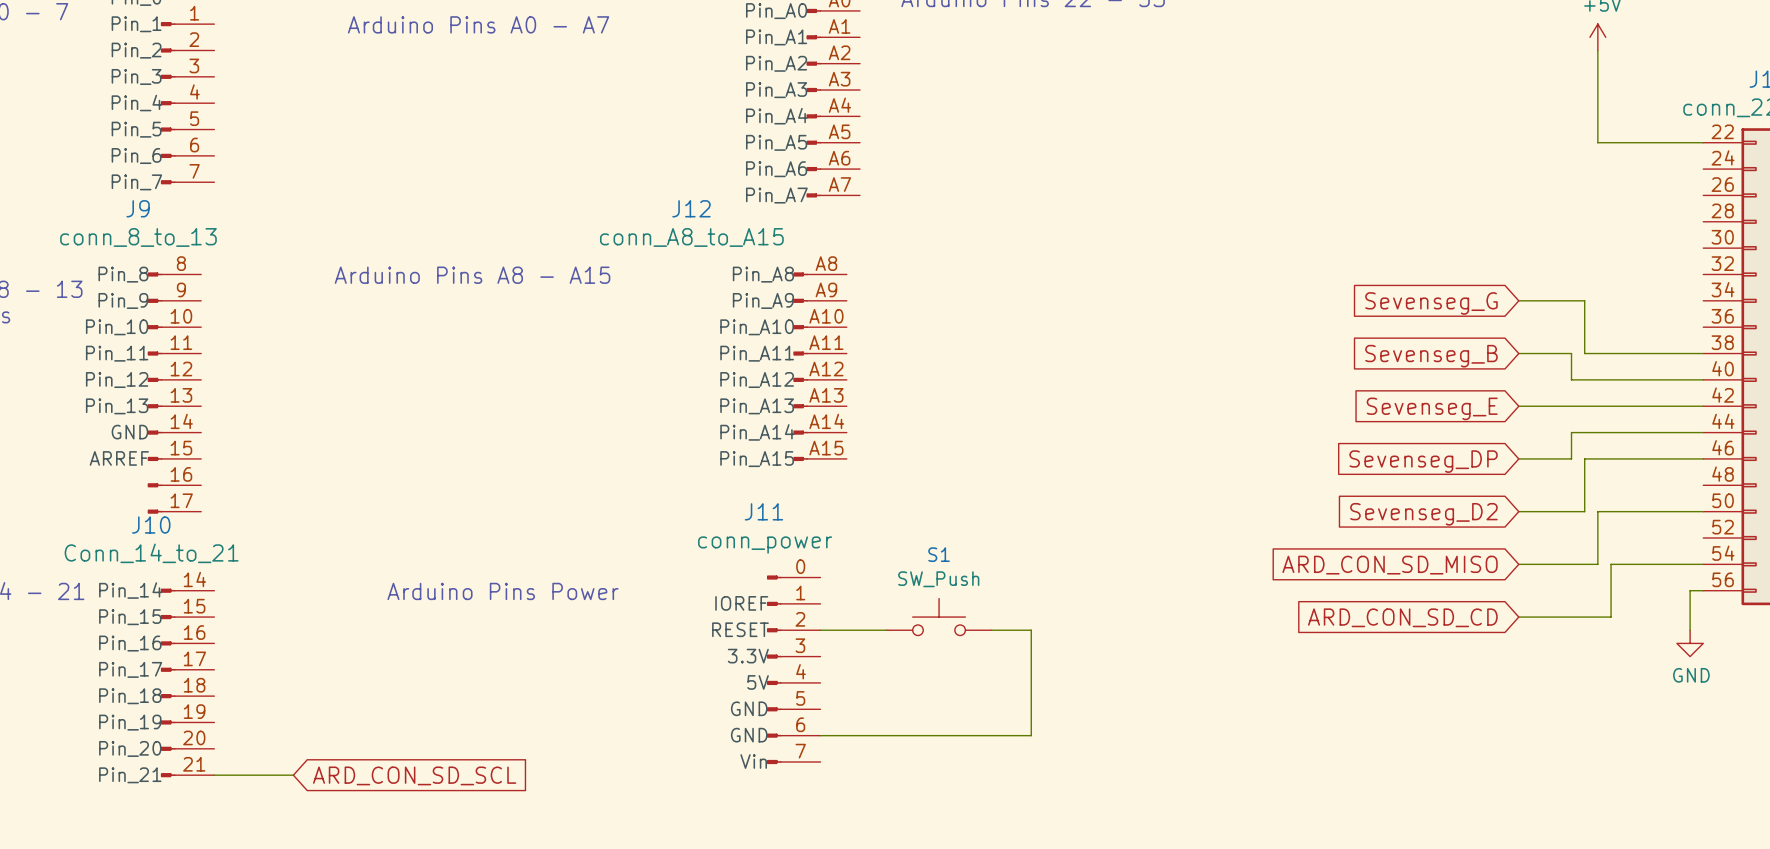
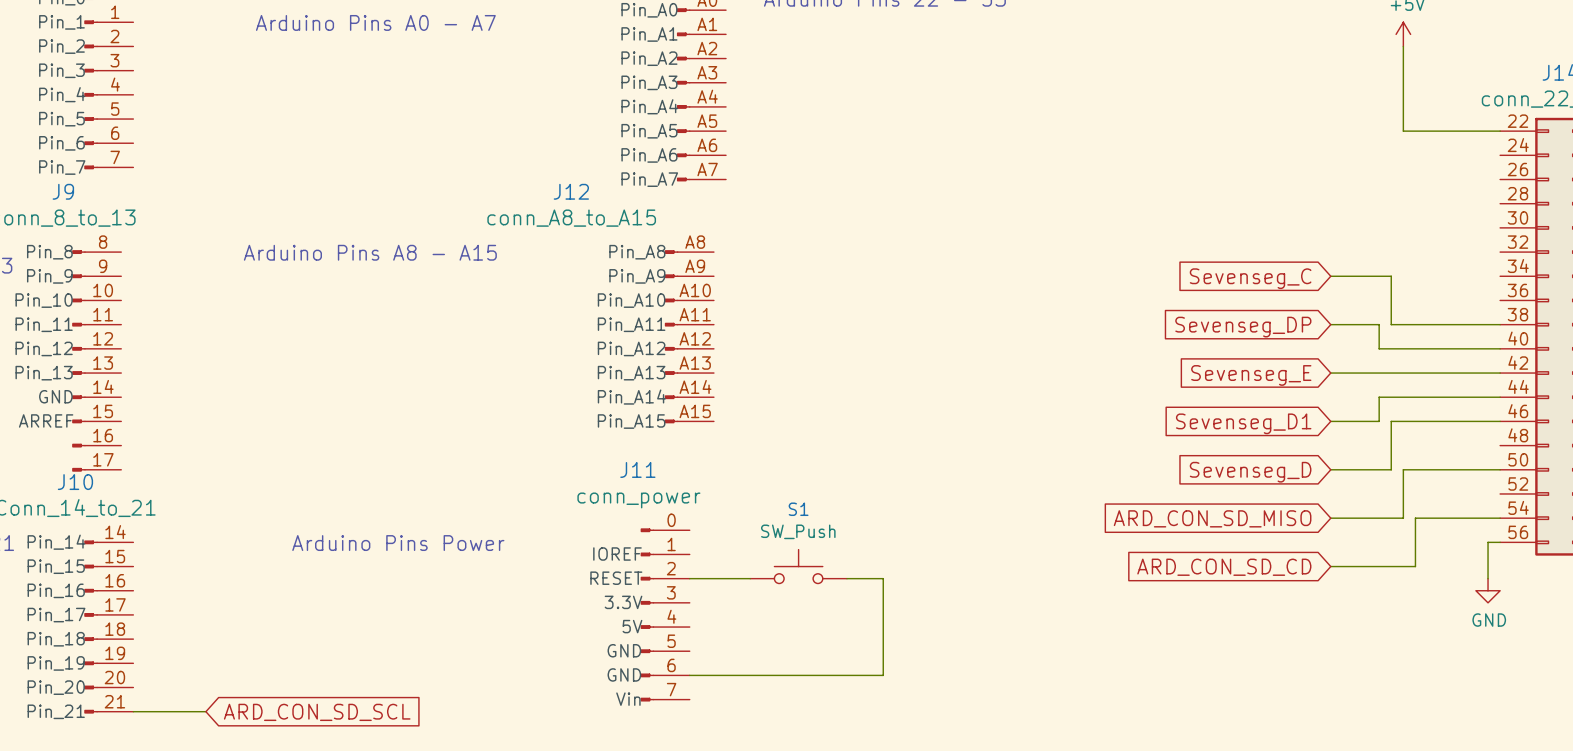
global label: Sevenseg_G (1431, 303) -> Sevenseg_C (1250, 278)
global label: Sevenseg_B (1431, 356) -> Sevenseg_DP (1243, 327)
global label: Sevenseg_DP (1423, 461) -> Sevenseg_D1 (1243, 423)
global label: Sevenseg_D2 (1423, 514) -> Sevenseg_D (1250, 472)

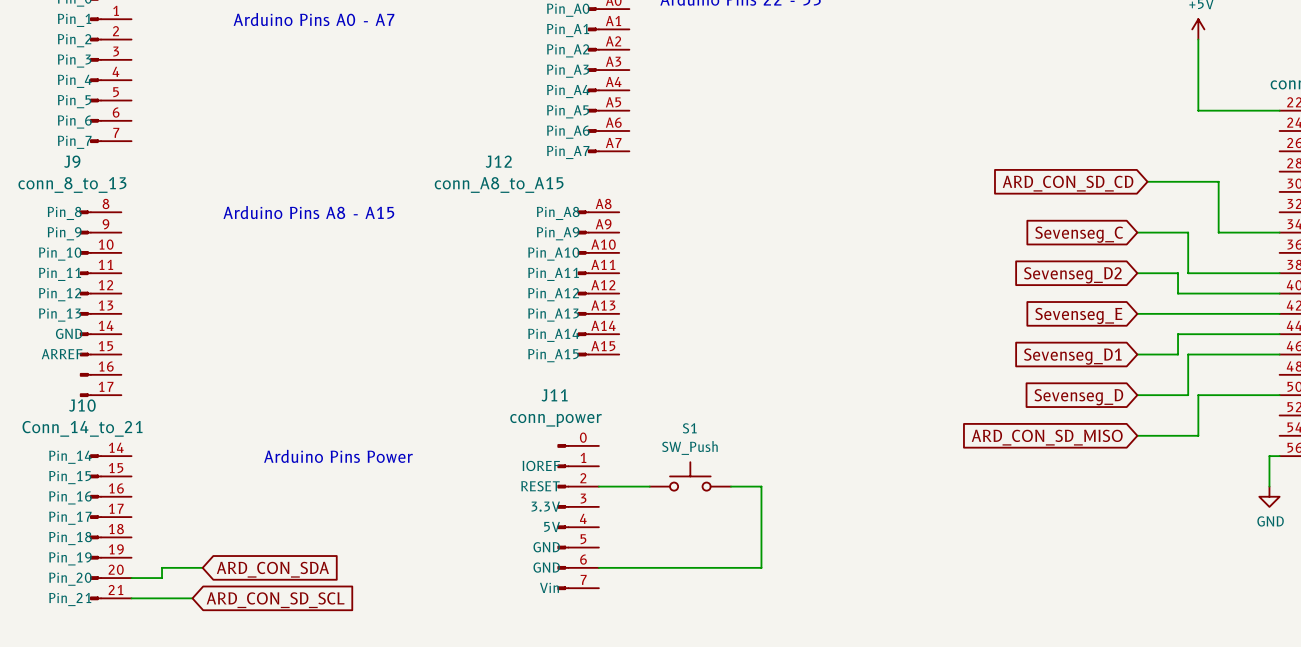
wire: none -> (1147, 181) (1218, 181) (1218, 232) (1279, 232)
global label: none -> ARD_CON_SD_CD (1068, 183)
global label: Sevenseg_DP (1243, 327) -> Sevenseg_D2 (1072, 275)
wire: (1500, 518) (1415, 518) (1415, 566) (1330, 566) -> none
global label: ARD_CON_SD_CD (1224, 567) -> none
wire: none -> (202, 567) (162, 567) (162, 578) (131, 578)
global label: none -> ARD_CON_SDA (272, 569)

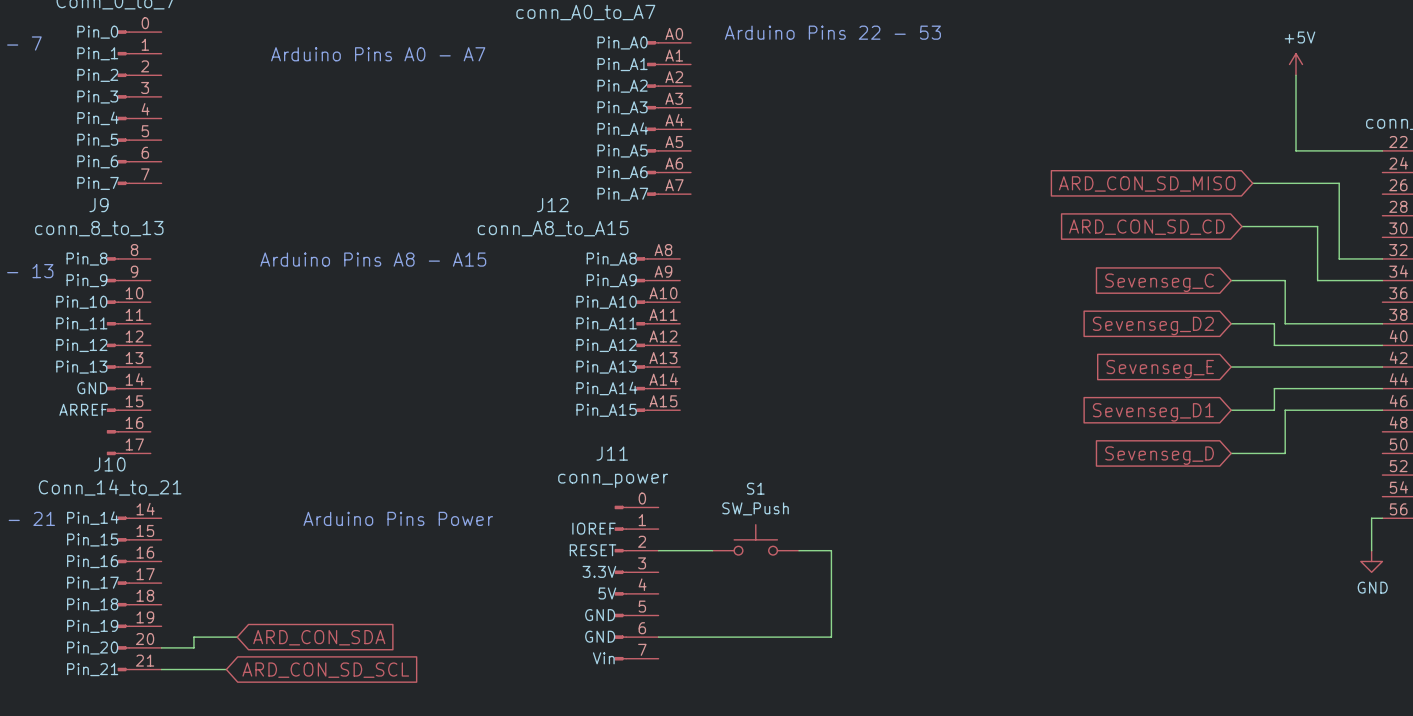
wire: none -> (1252, 183) (1339, 183) (1339, 258) (1382, 258)
global label: none -> ARD_CON_SD_MISO (1147, 183)
wire: (1279, 395) (1198, 395) (1198, 435) (1137, 435) -> none
global label: ARD_CON_SD_MISO (1047, 437) -> none

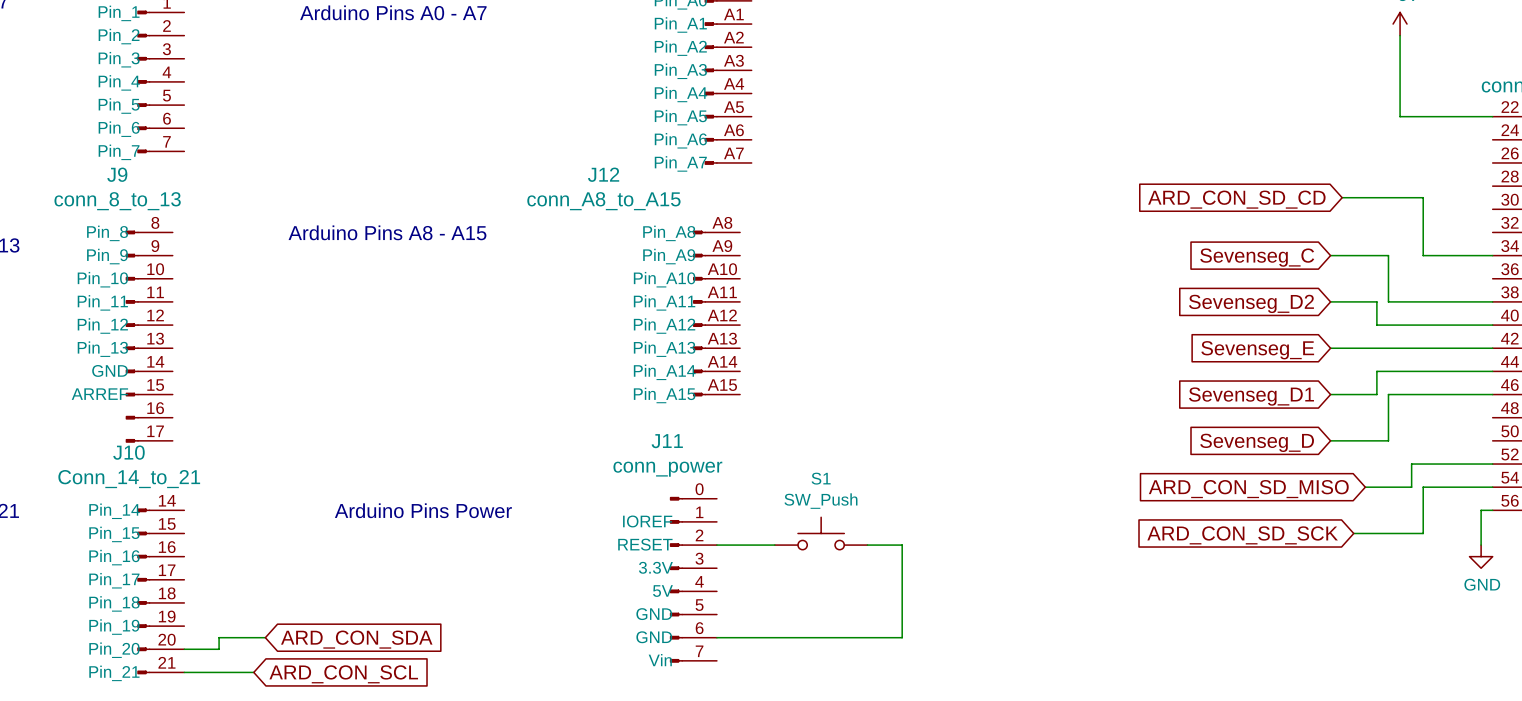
global label: ARD_CON_SD_MISO (1147, 183) -> none
wire: (1252, 183) (1339, 183) (1339, 258) (1382, 258) -> none
wire: none -> (1492, 464) (1411, 464) (1411, 487) (1365, 487)
wire: none -> (1492, 487) (1423, 487) (1423, 533) (1353, 533)
global label: none -> ARD_CON_SD_MISO (1248, 489)
global label: none -> ARD_CON_SD_SCK (1242, 535)
global label: ARD_CON_SD_SCL (325, 670) -> ARD_CON_SCL (343, 674)

